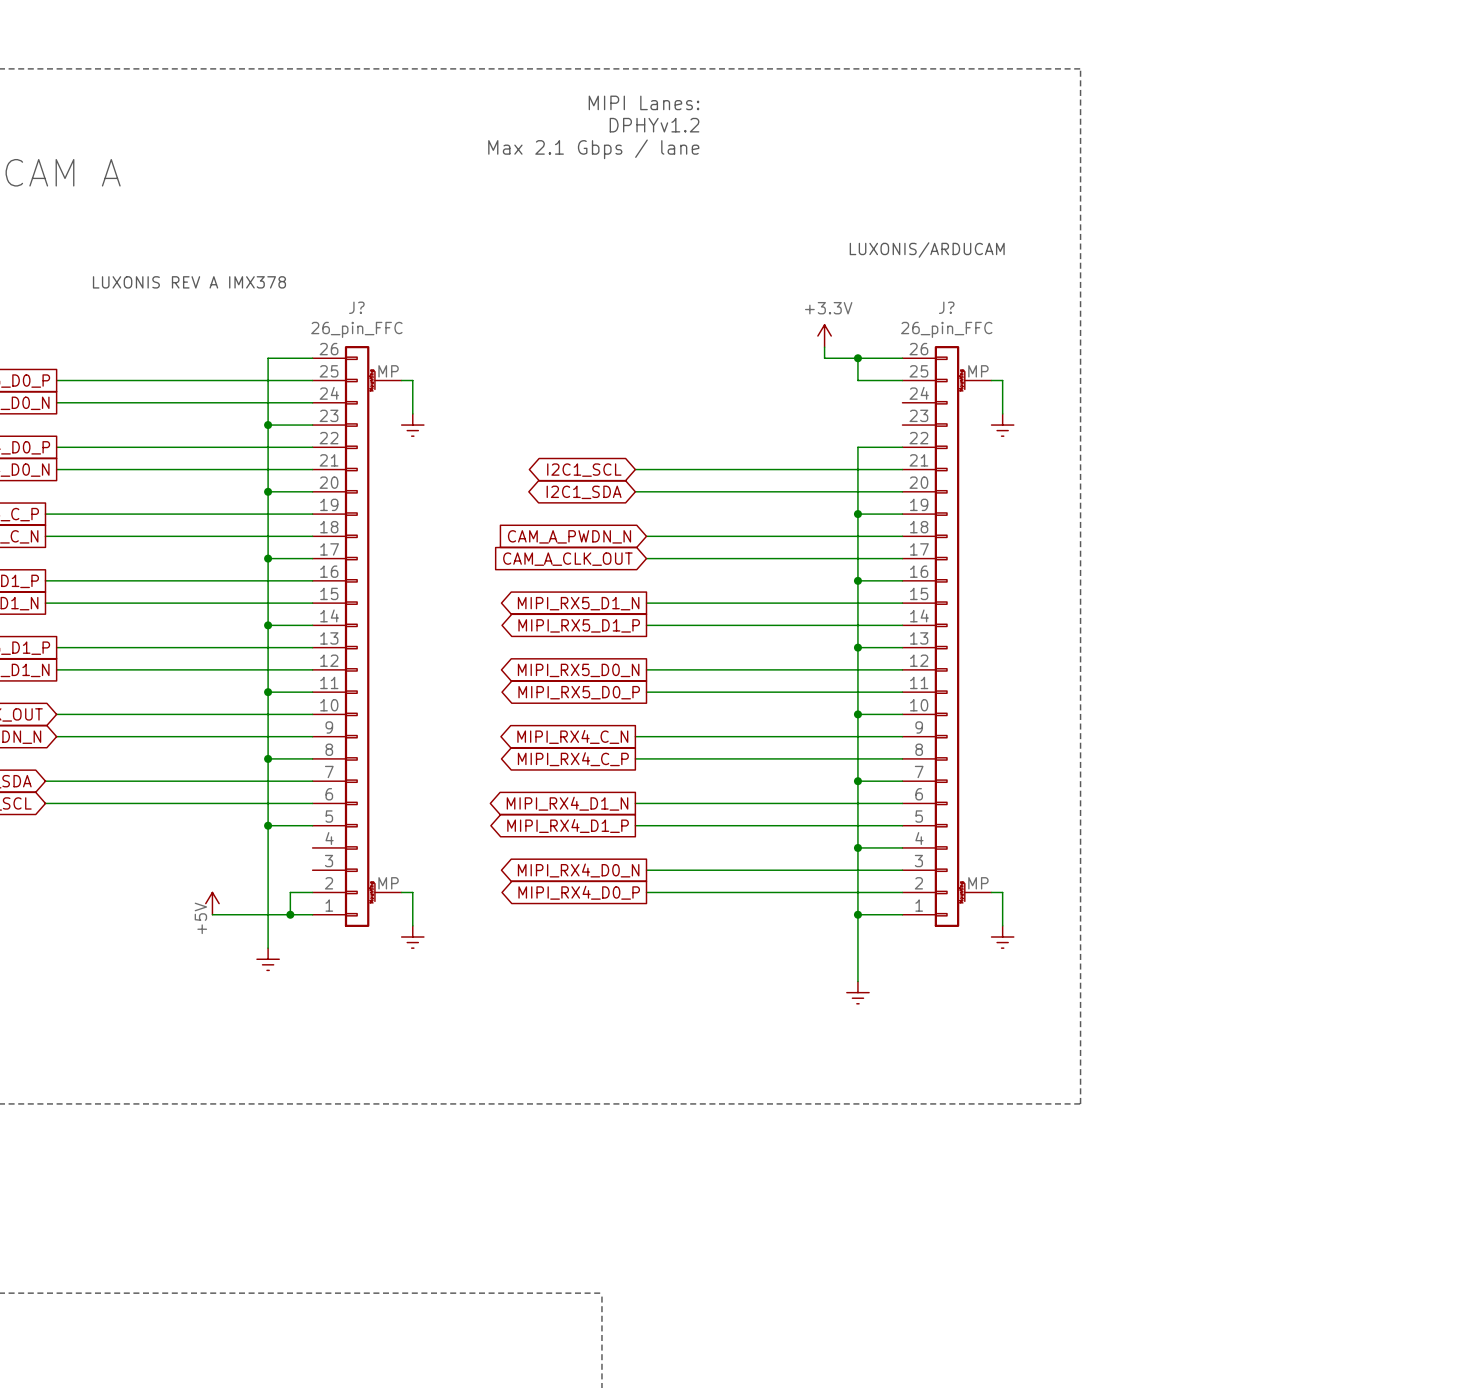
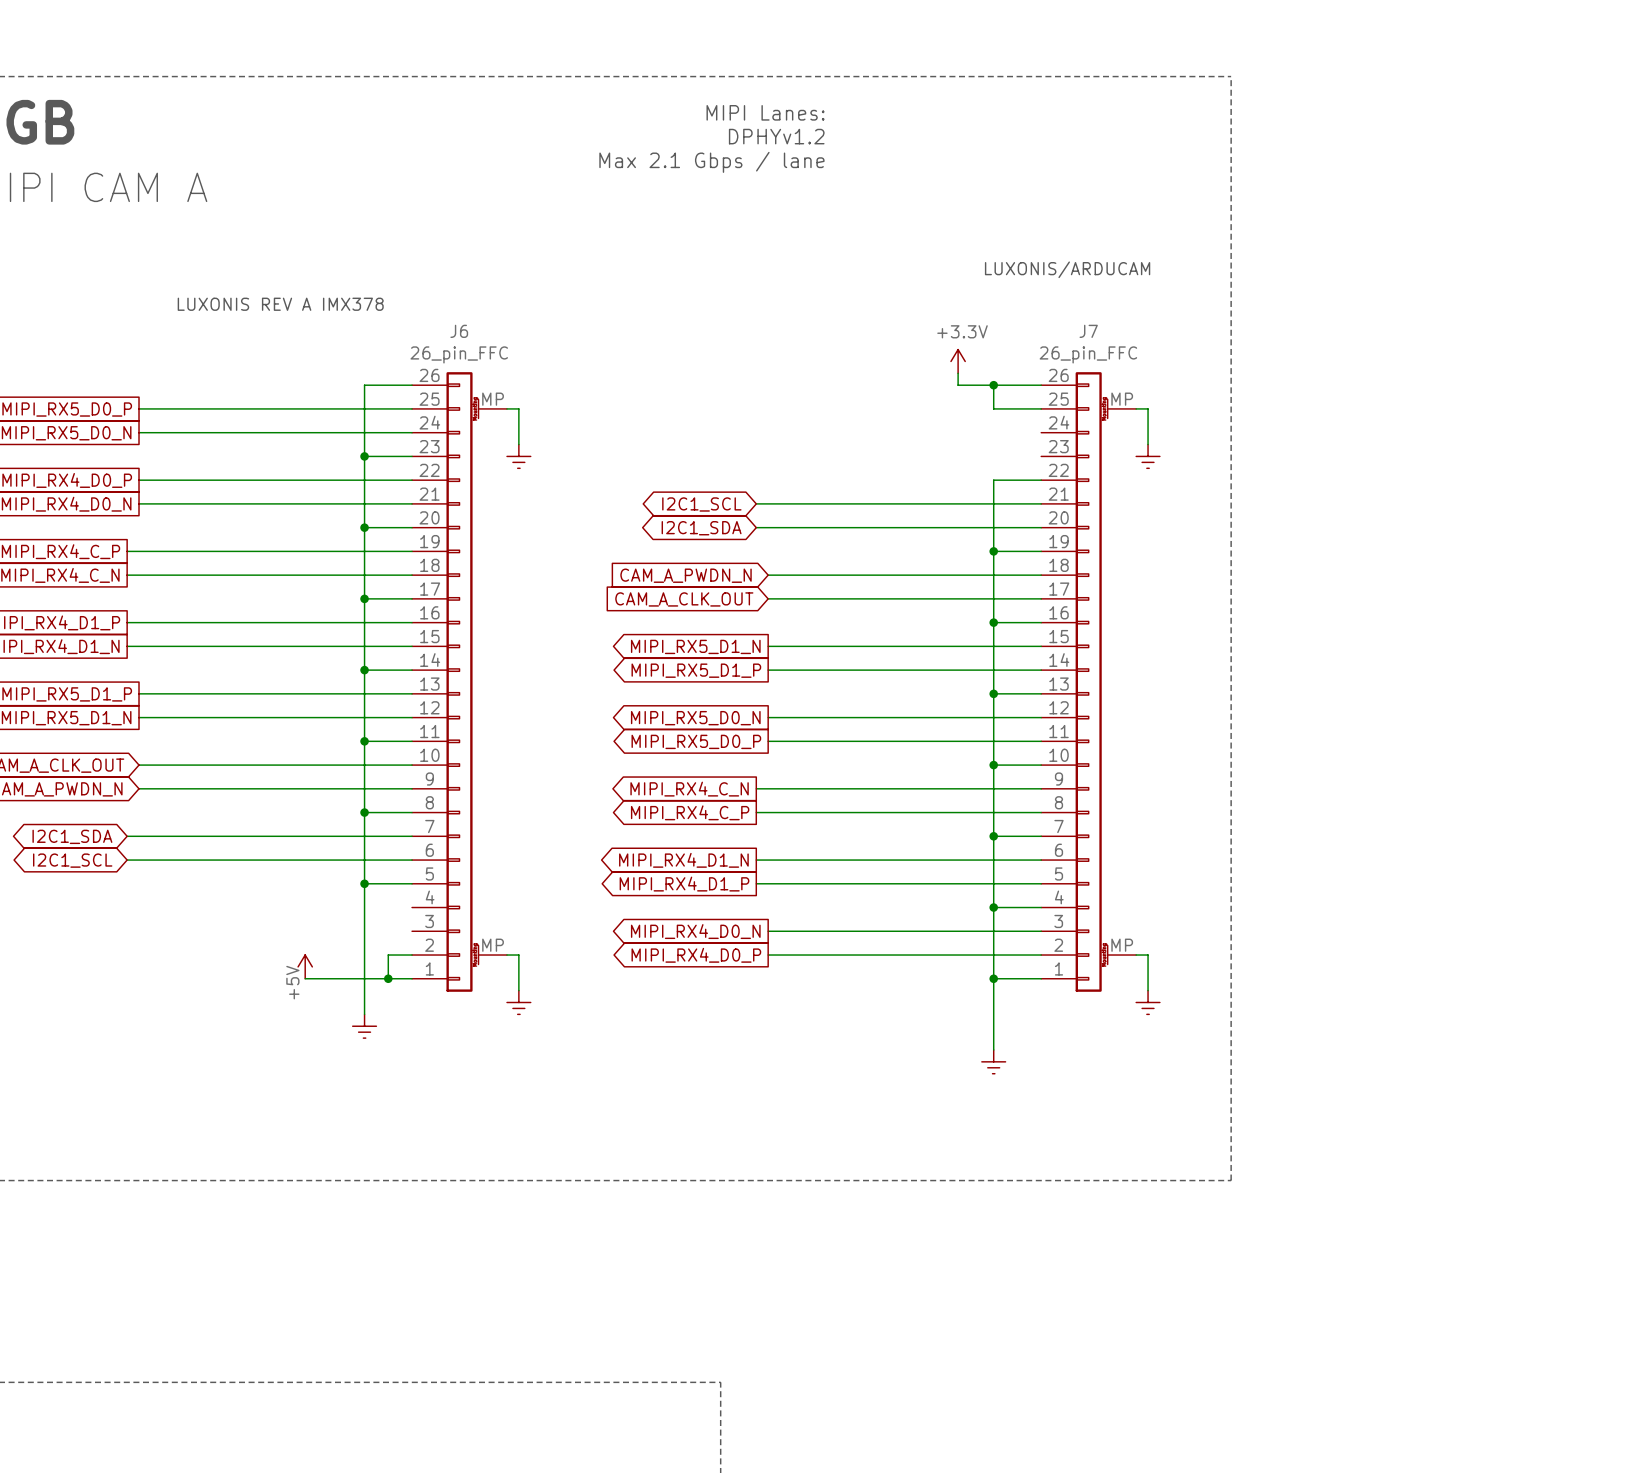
J? name: J? (356, 307) -> J6 (459, 331)
J? name: J? (946, 307) -> J7 (1088, 331)

